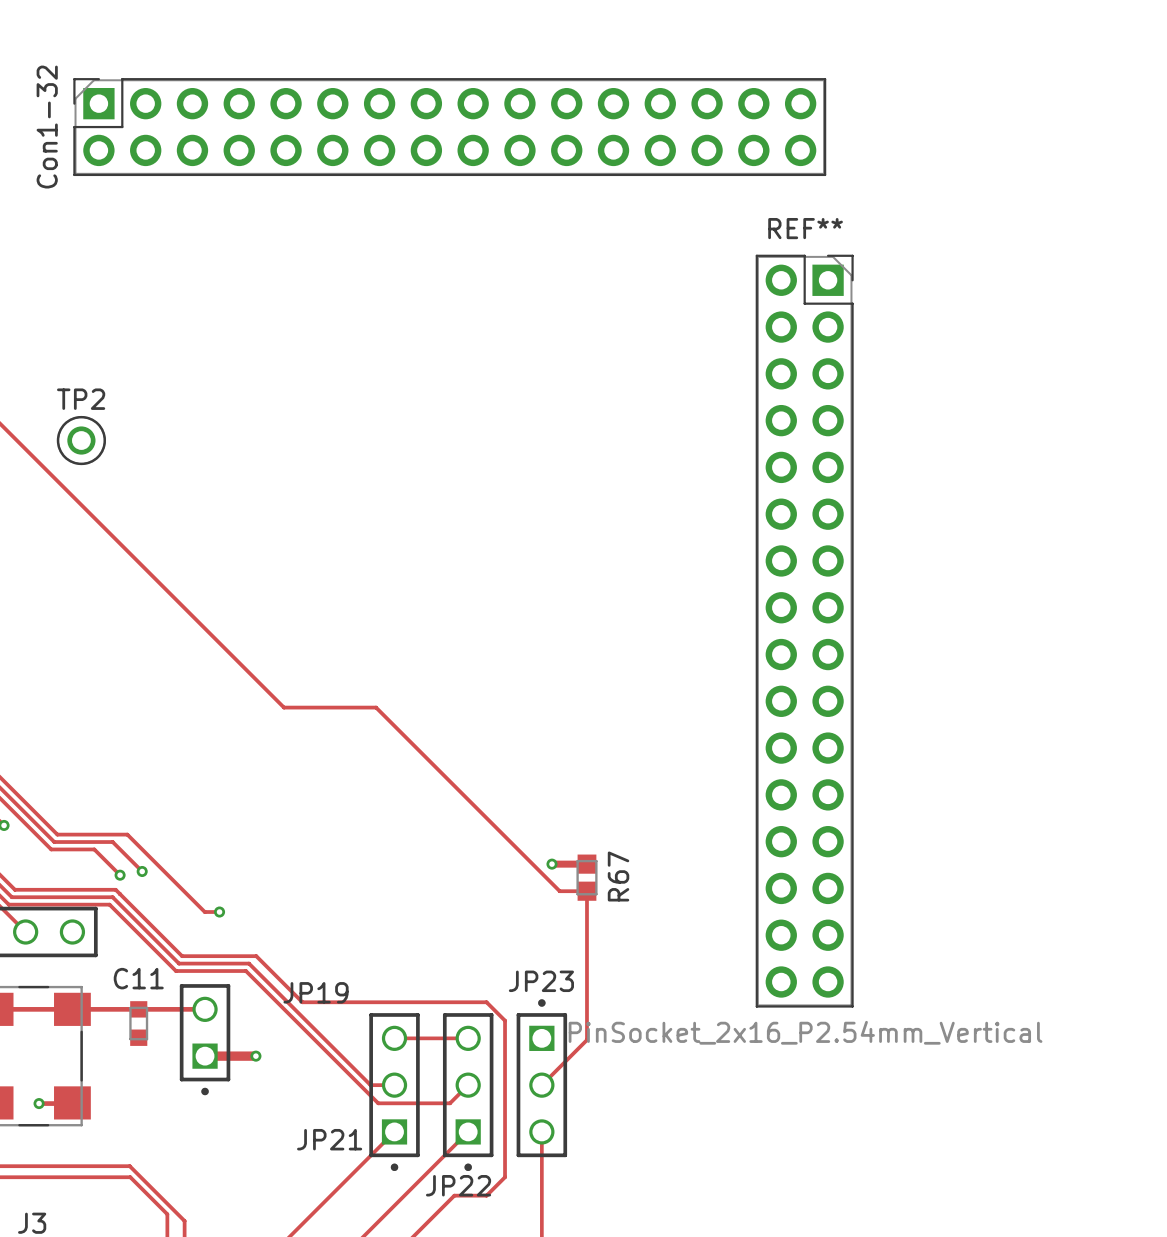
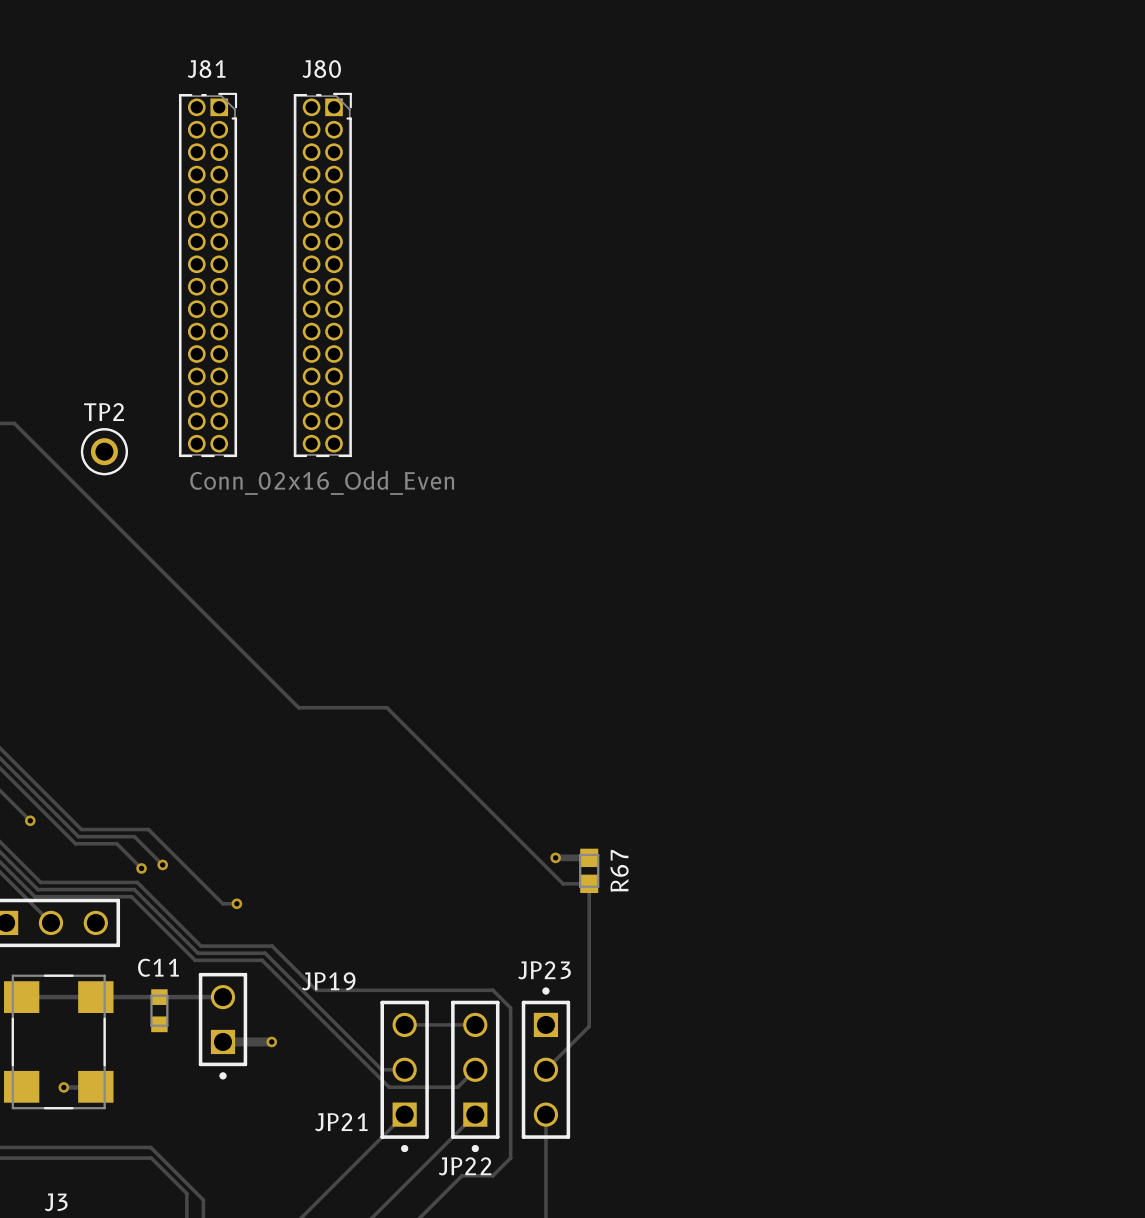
Con1-32: (449, 127) -> none
J81: none -> (208, 274)
J80: none -> Conn_02x16_Odd_Even (322, 274)
REF**: PinSocket_2x16_P2.54mm_Vertical (804, 631) -> none

